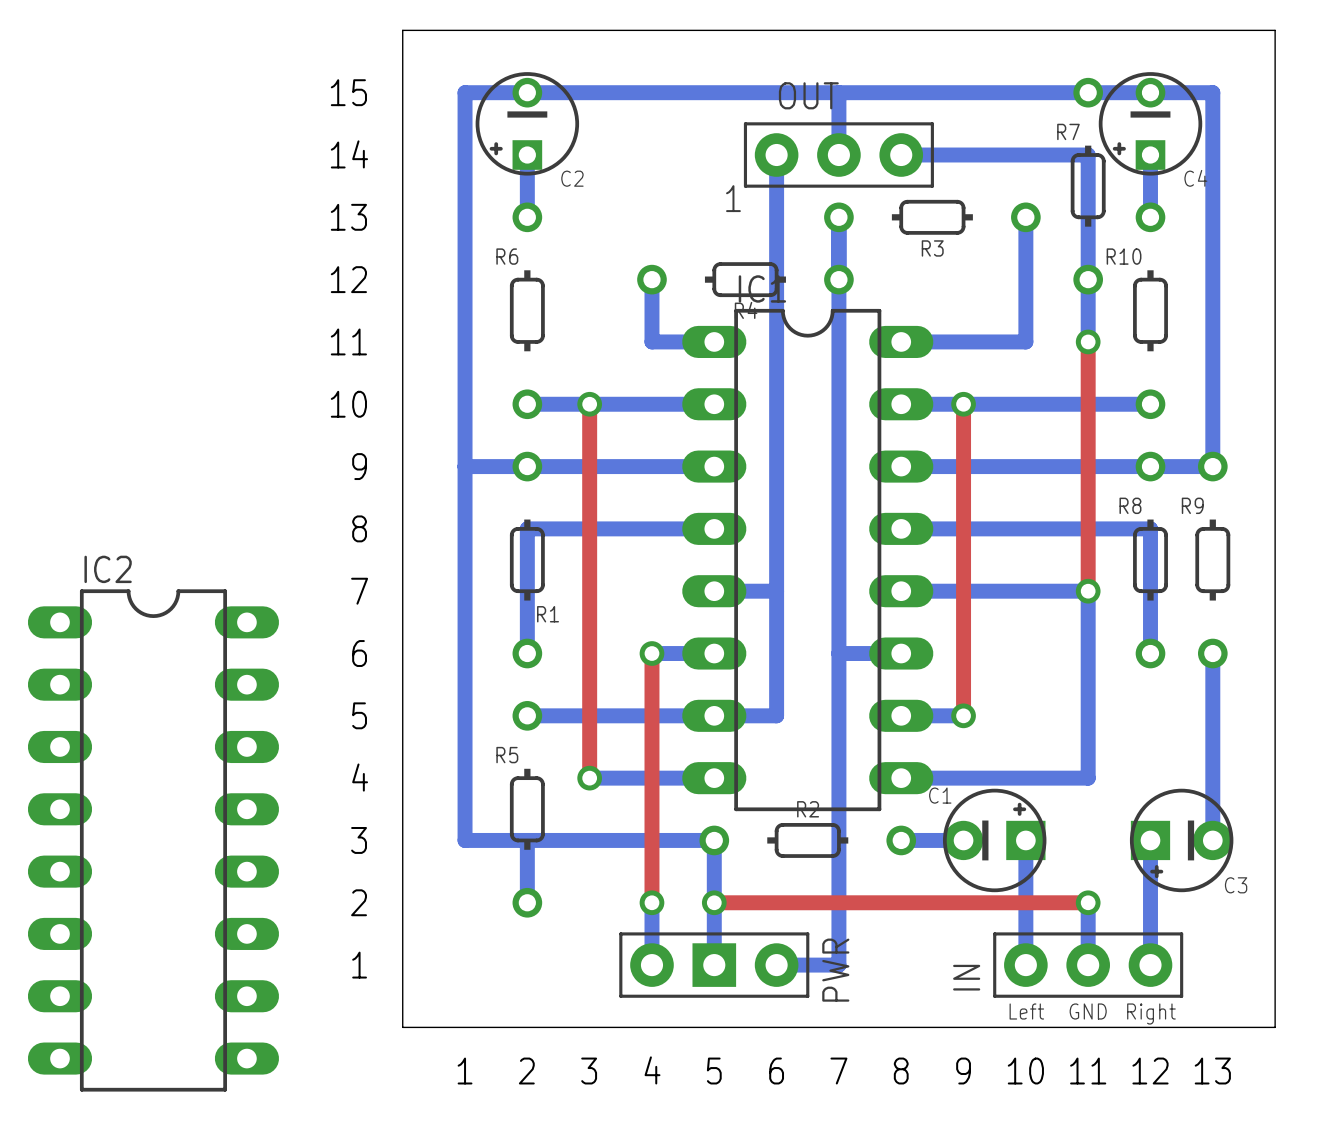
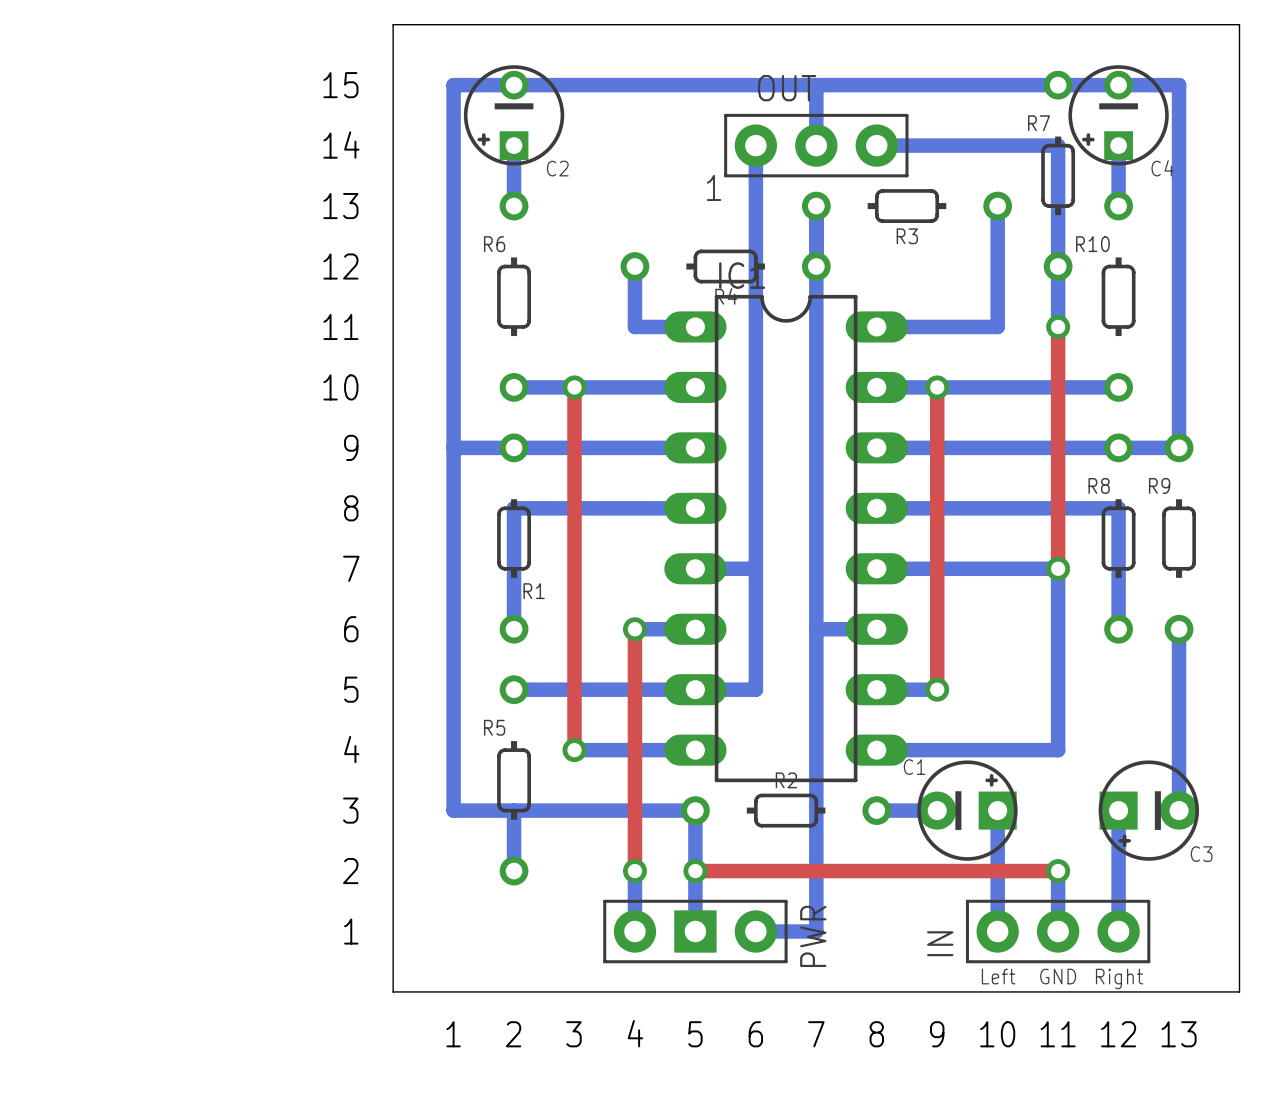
IC2: (153, 840) -> none

